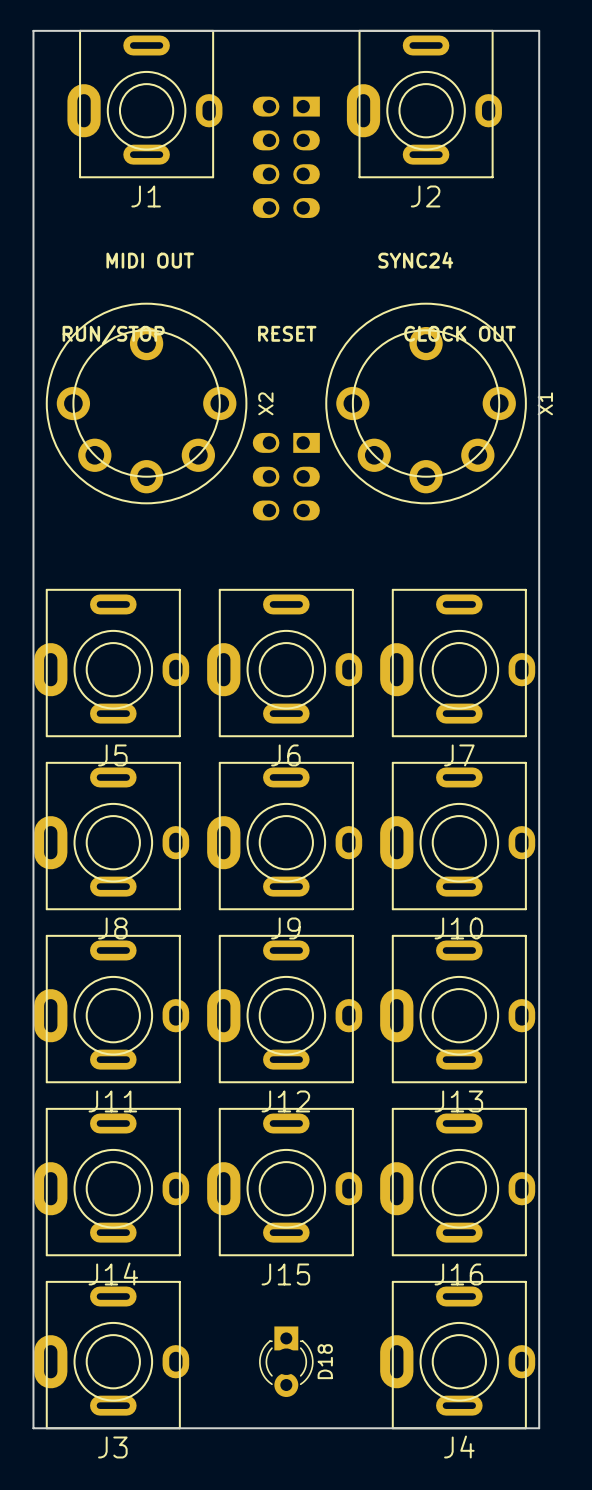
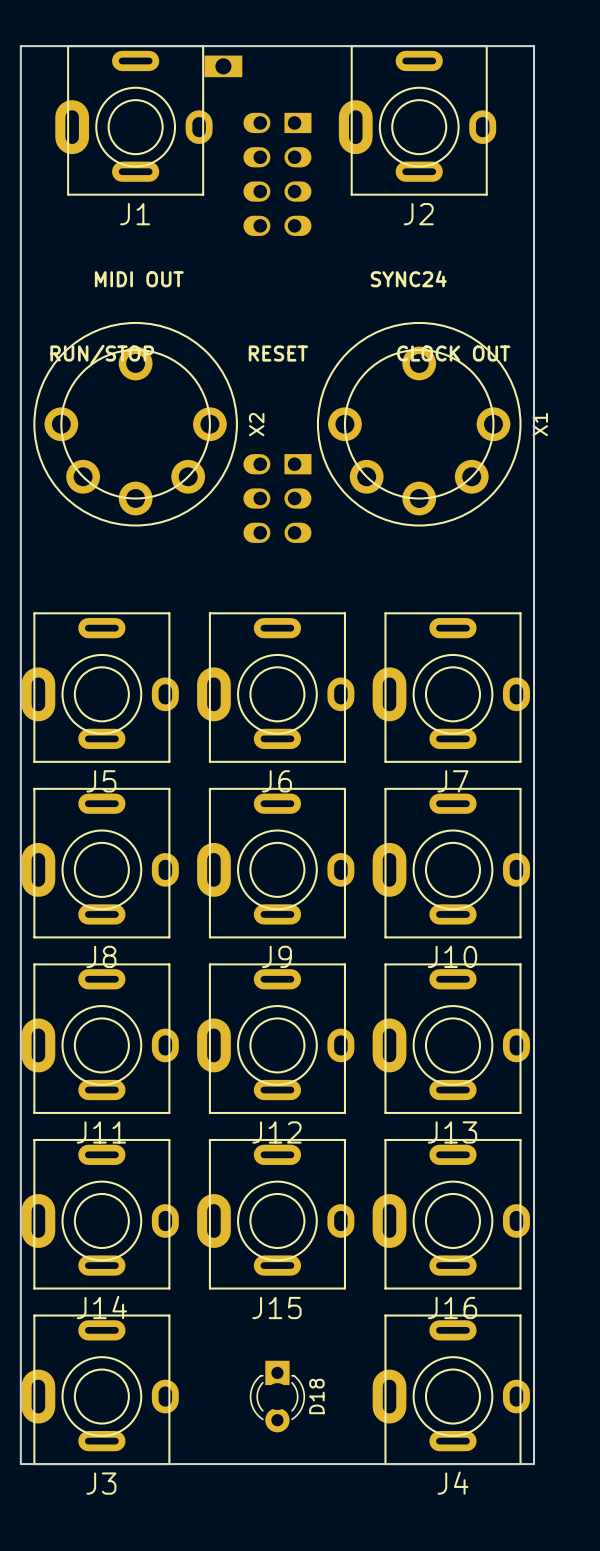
part: none -> (223, 66)

